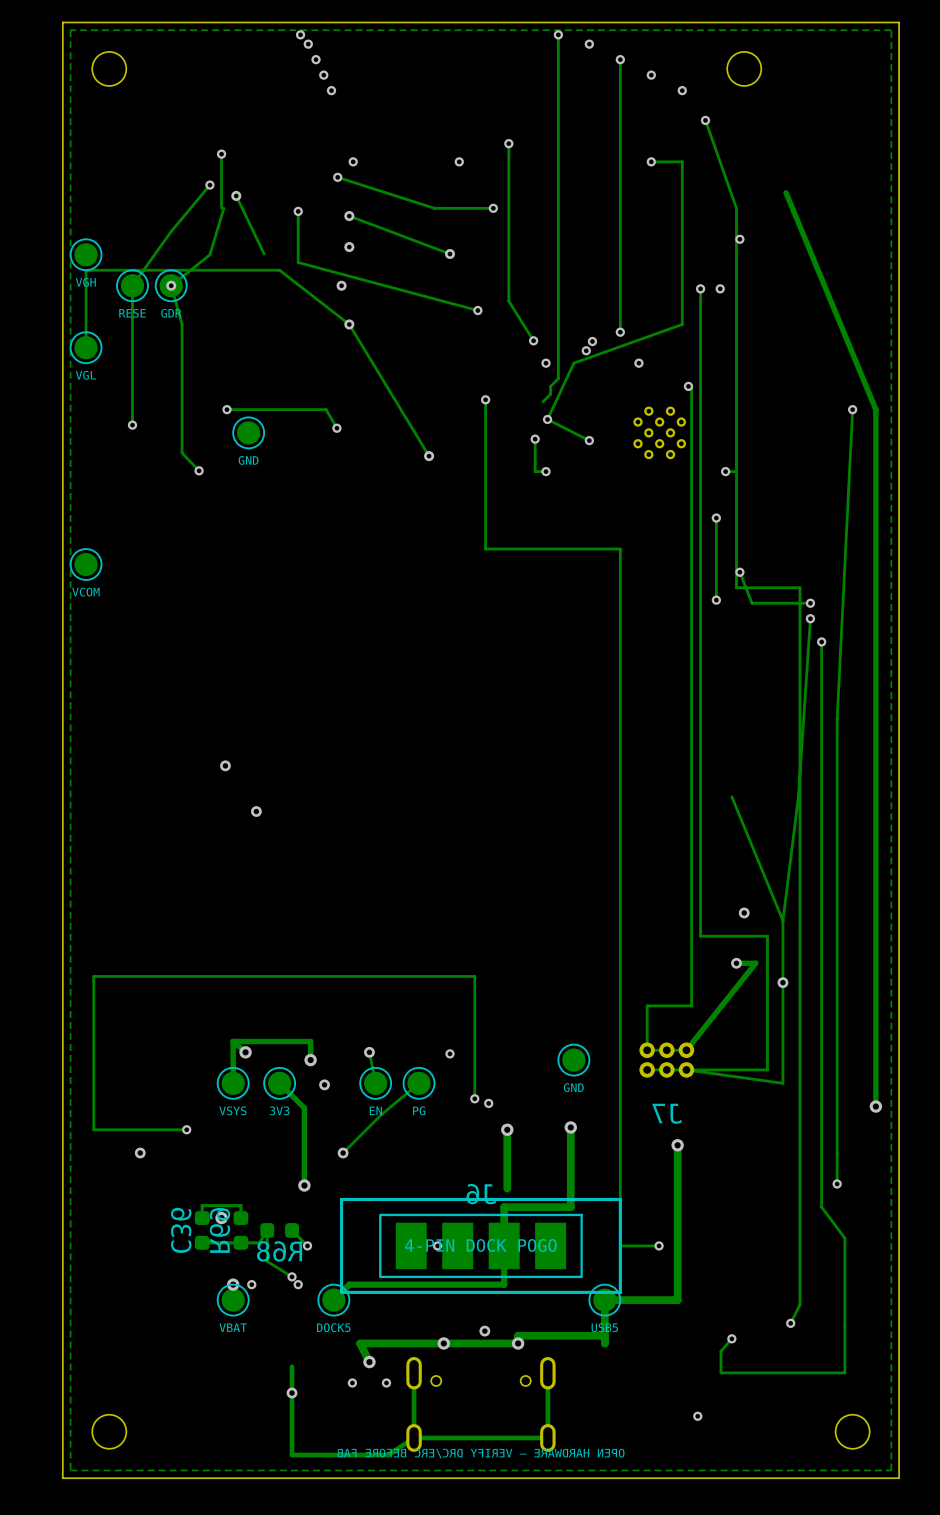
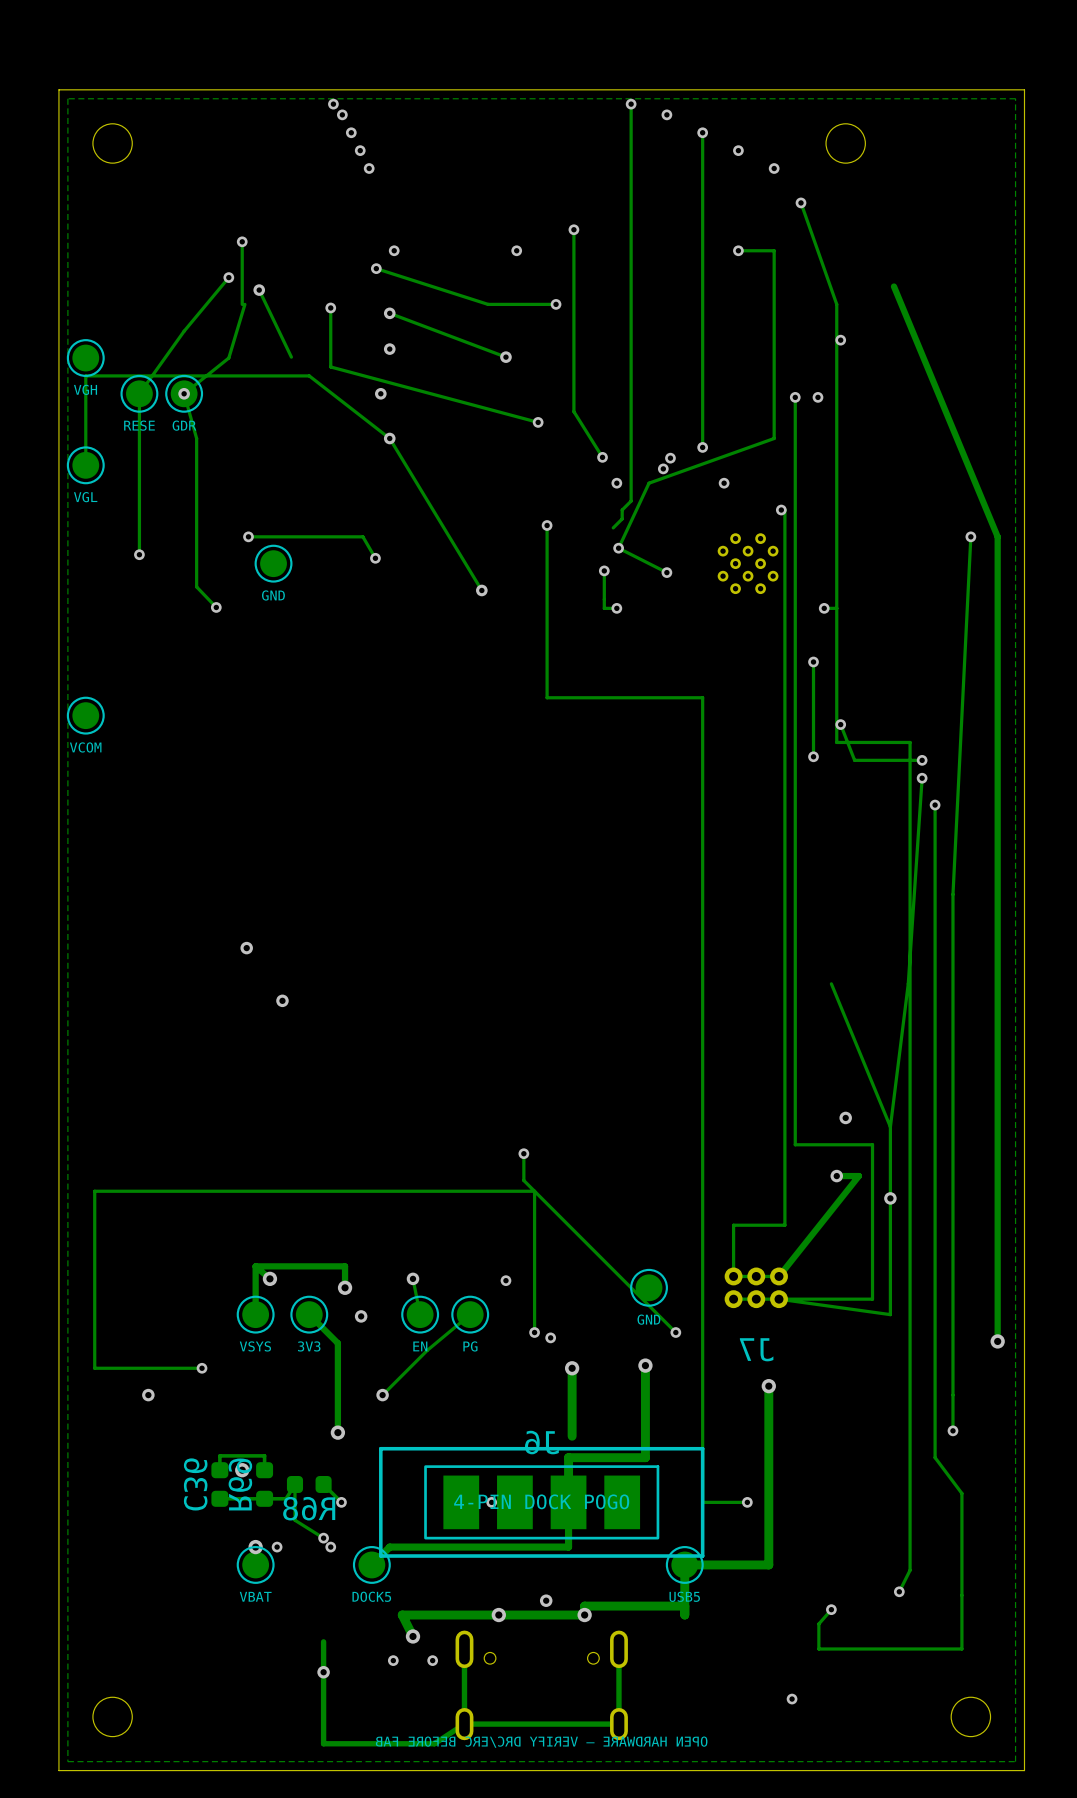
track: none -> (523, 1153) (523, 1180) (675, 1332)
via: none -> (523, 1153)
via: none -> (675, 1332)

